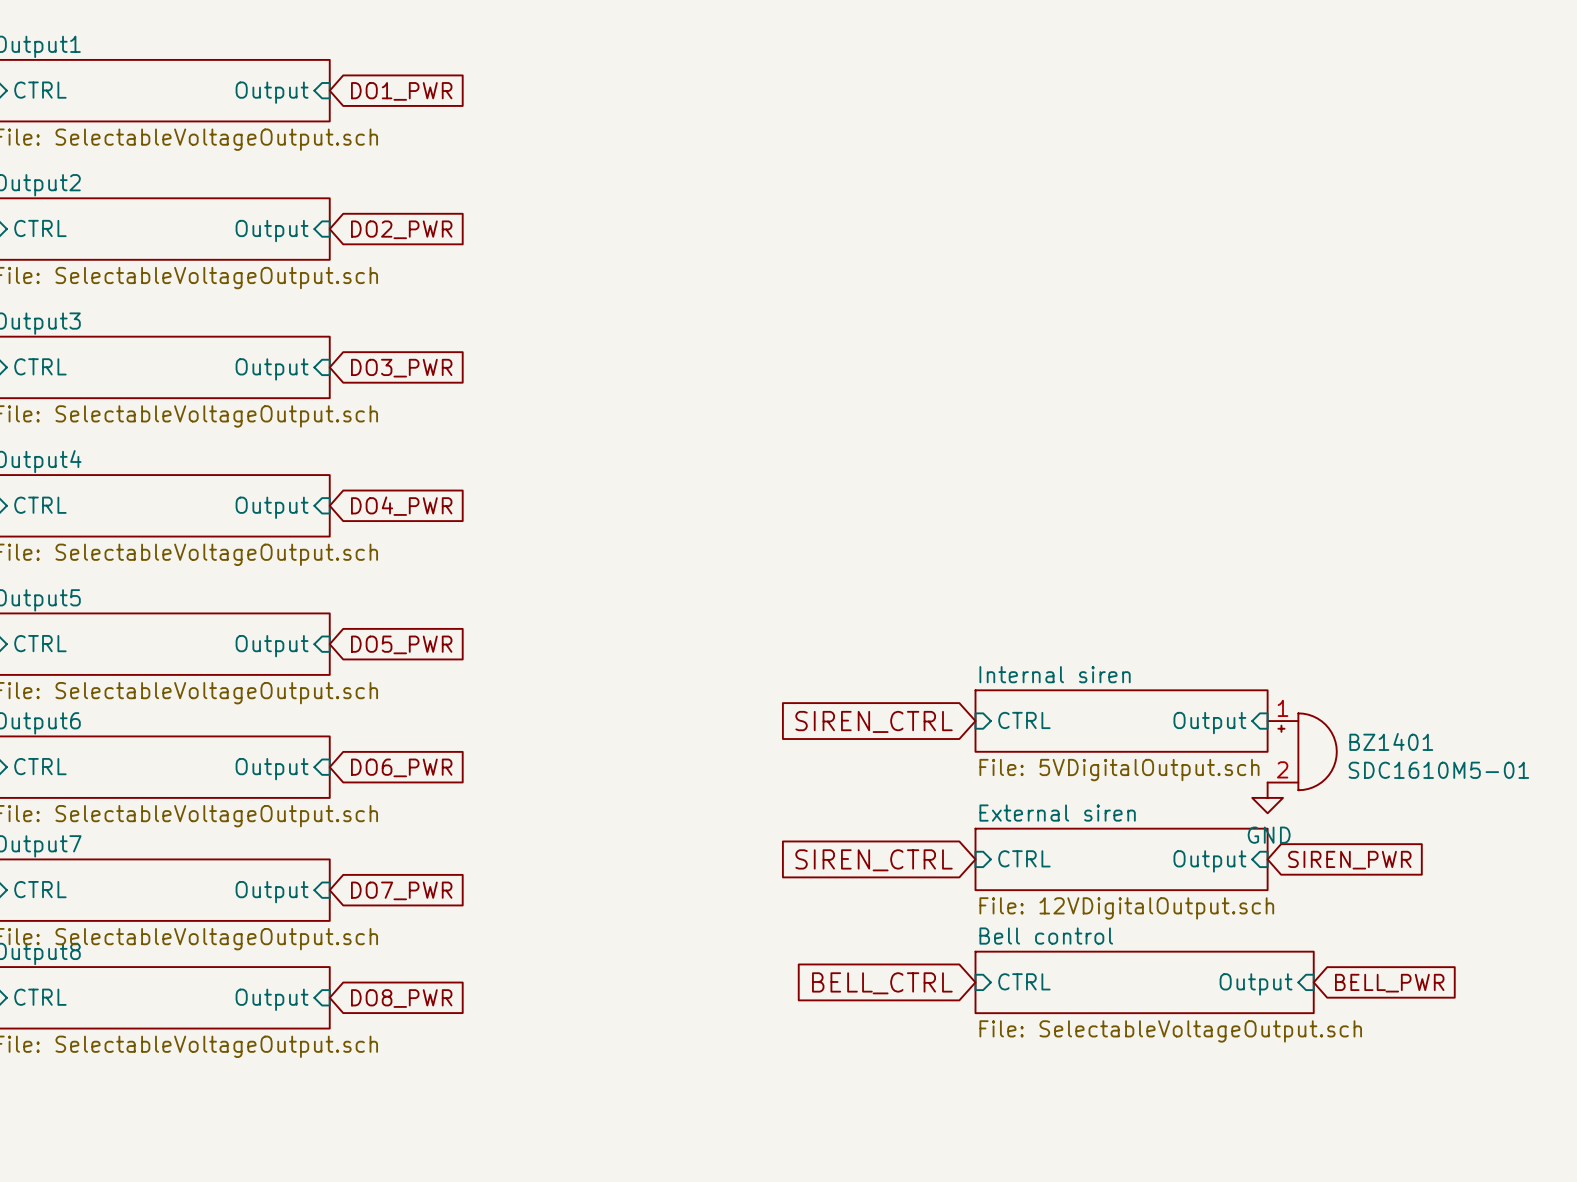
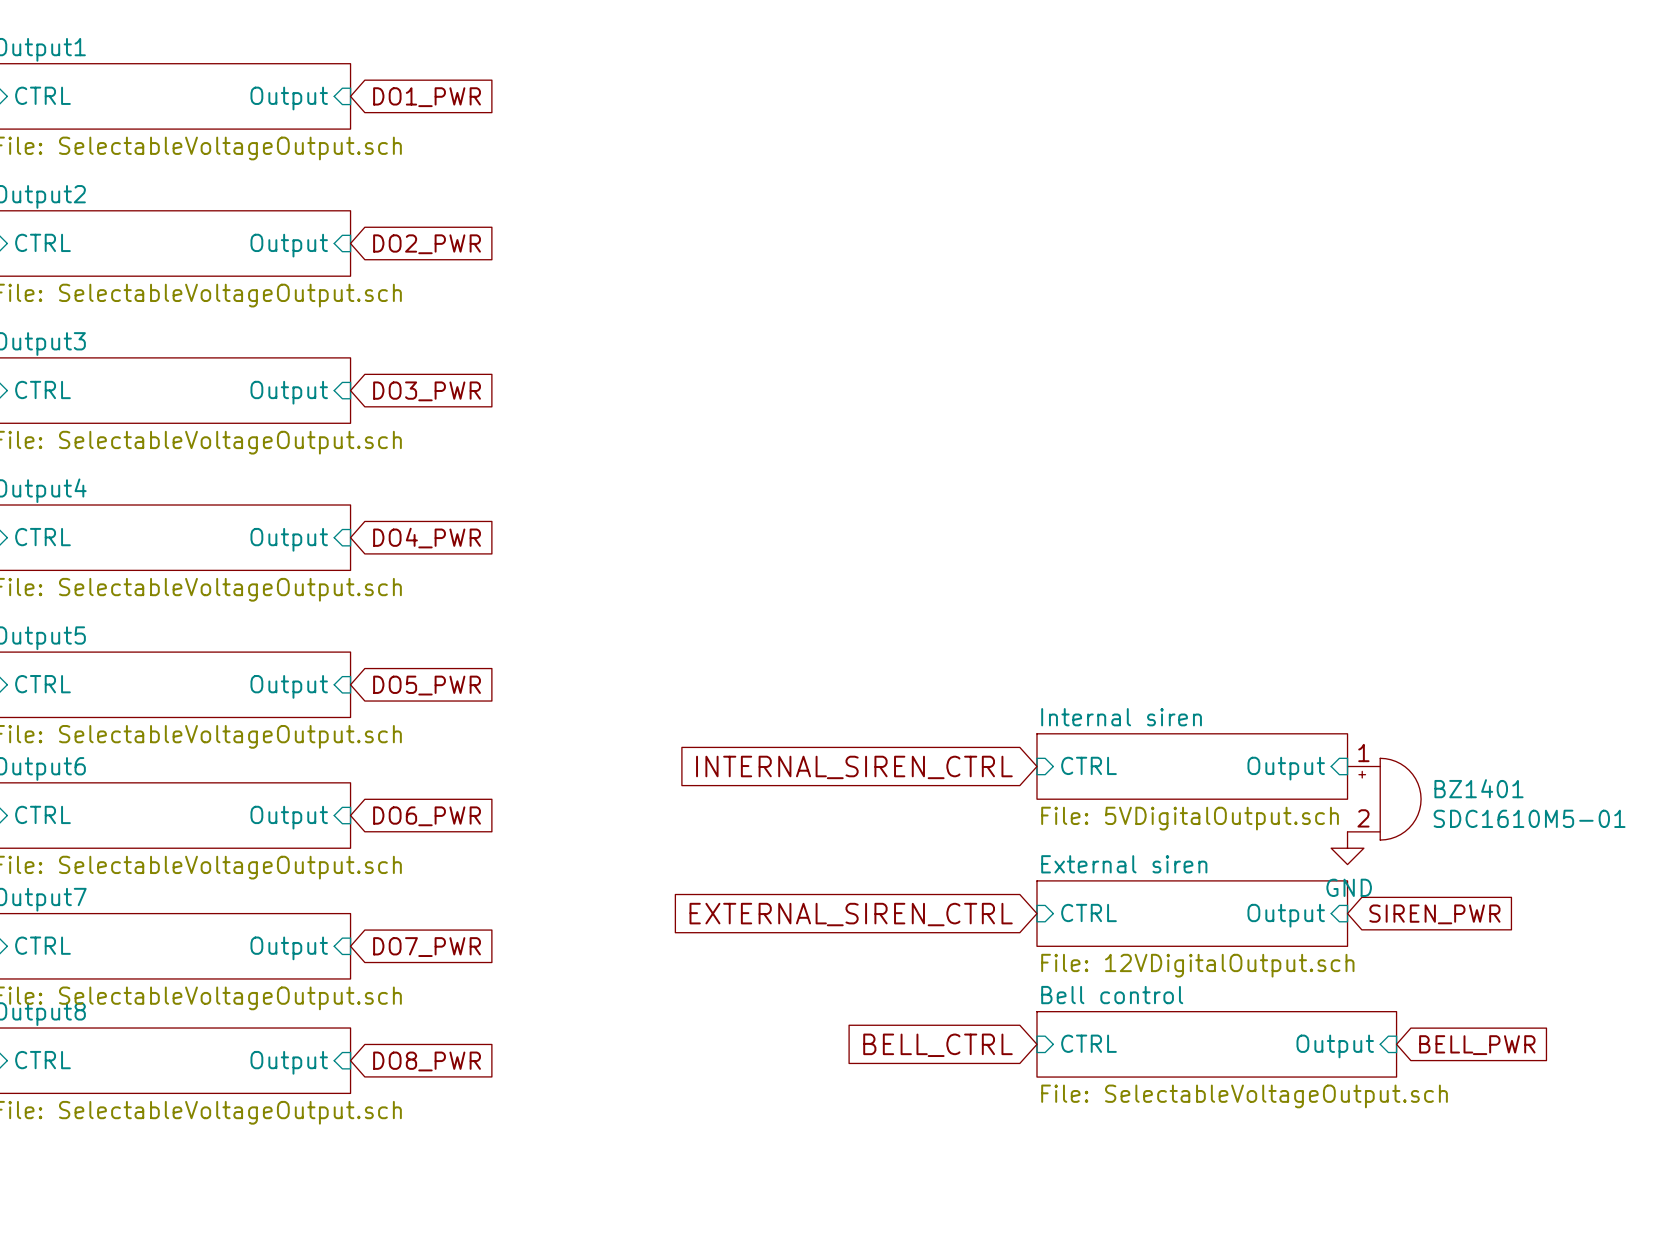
global label: SIREN_CTRL (874, 721) -> INTERNAL_SIREN_CTRL (854, 767)
global label: SIREN_CTRL (874, 860) -> EXTERNAL_SIREN_CTRL (851, 914)

